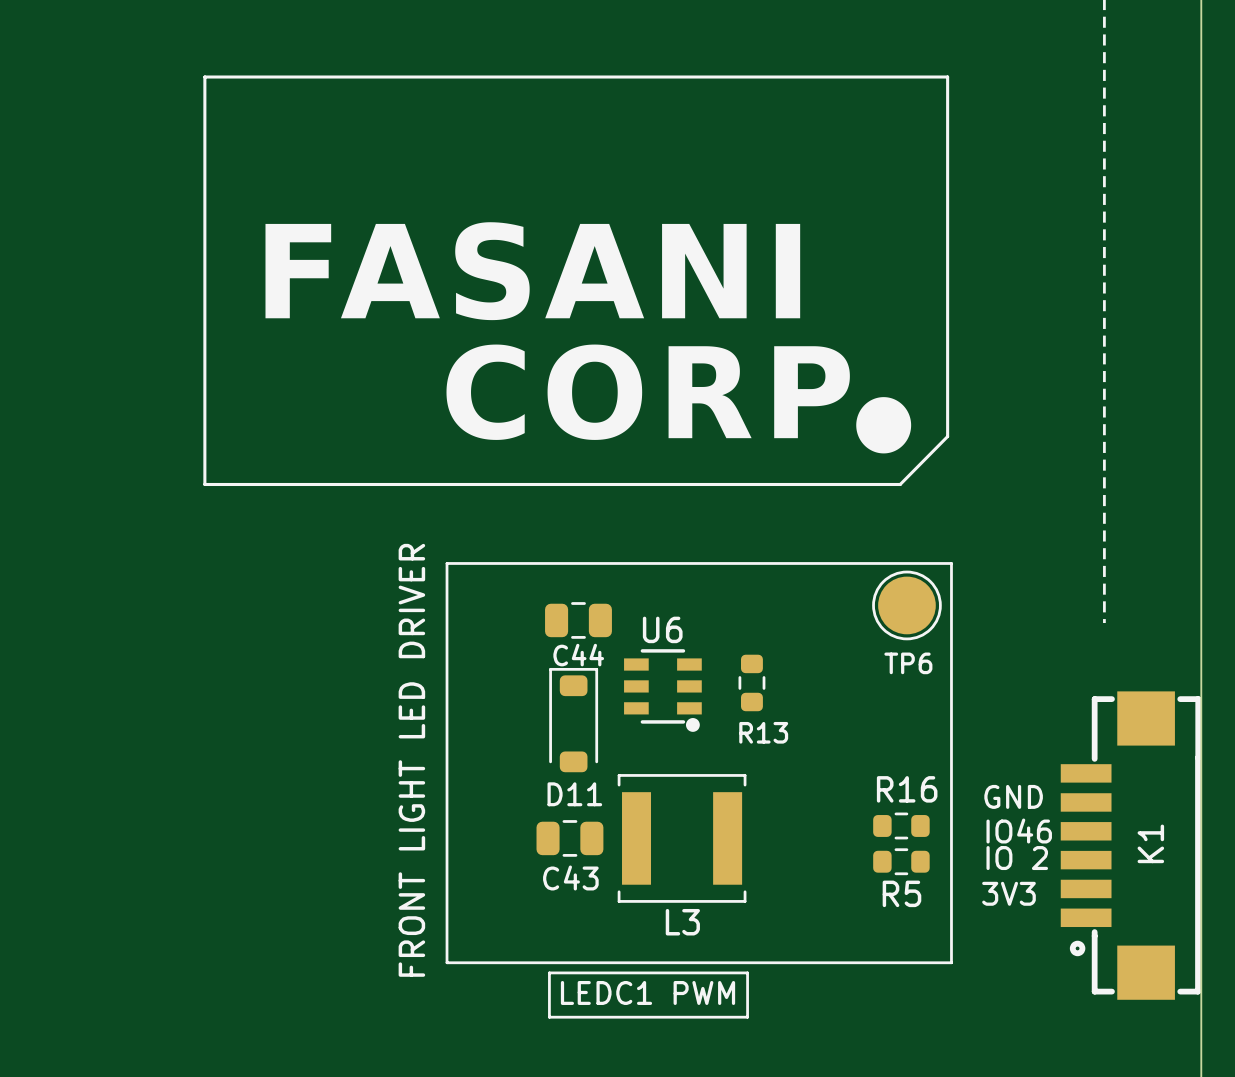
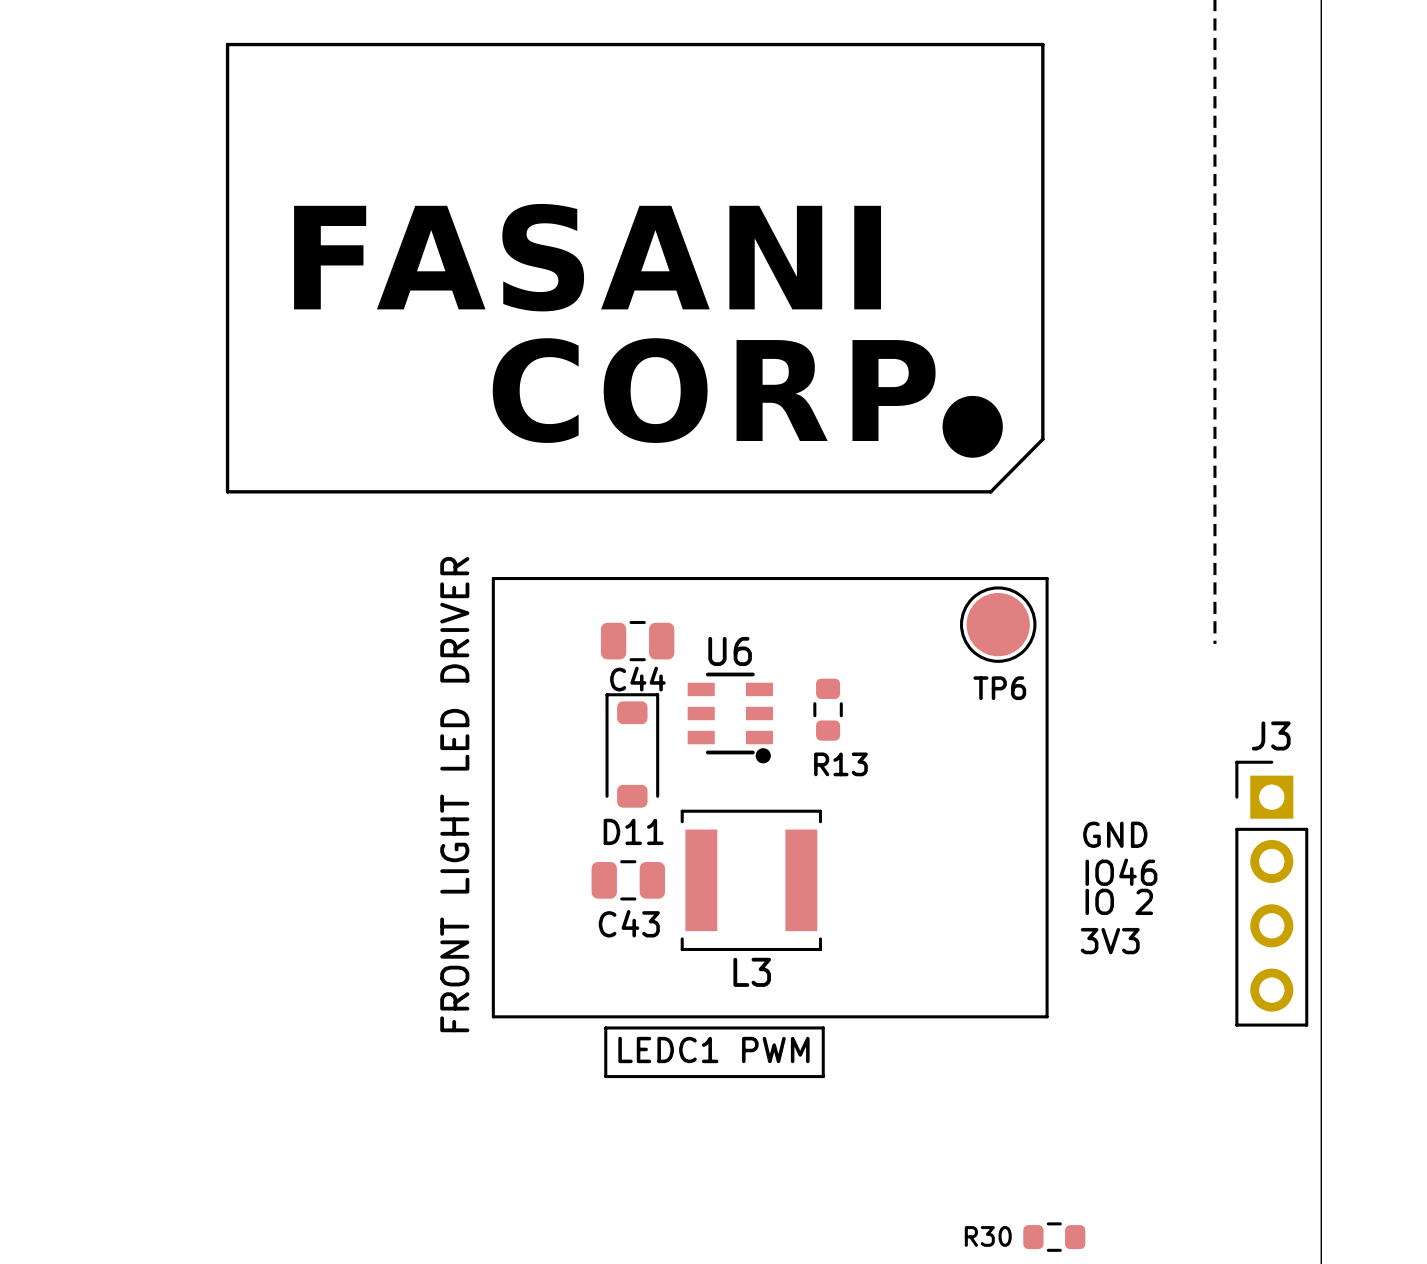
R16: (901, 825) -> none
K1: (1130, 845) -> none
J3: none -> (1271, 893)
R5: (901, 861) -> none

